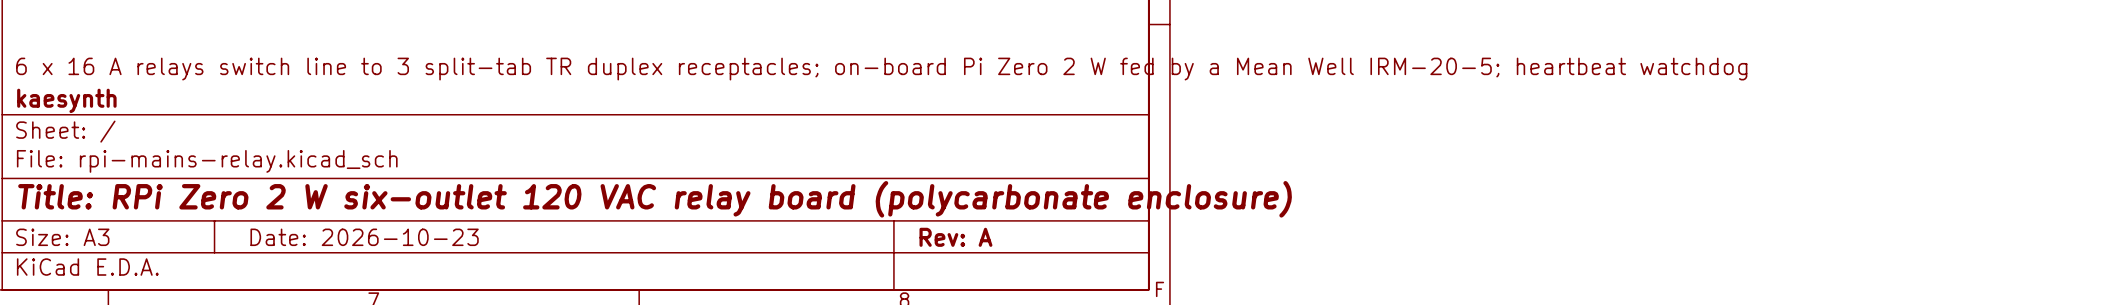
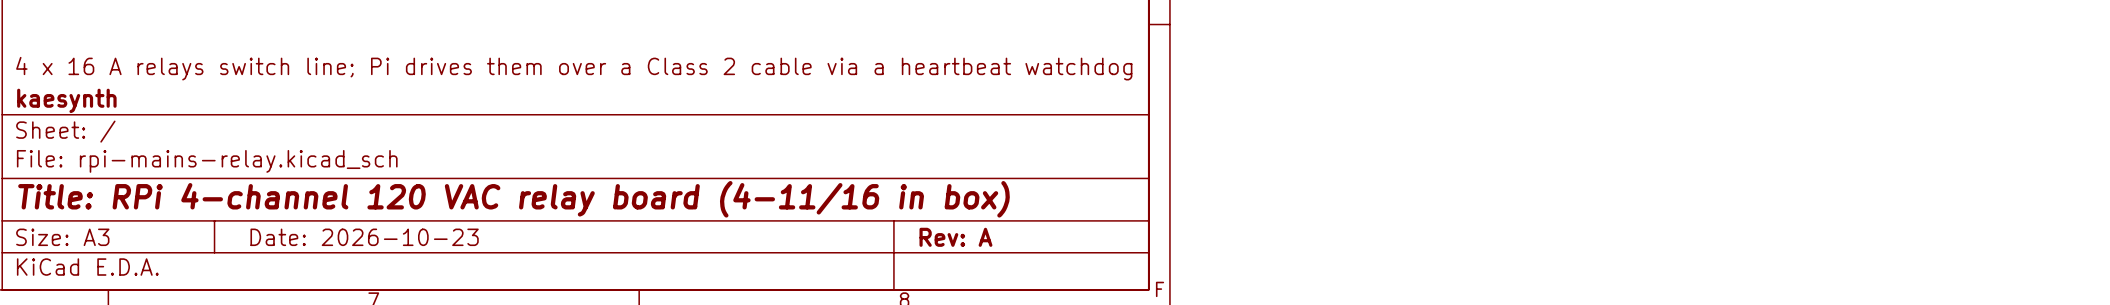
title block: 6 x 16 A relays switch line to 3 split-tab TR duplex receptacles; on-board Pi Zero 2 W fed by a Mean Well IRM-20-5; heartbeat watchdog (881, 69) -> 4 x 16 A relays switch line; Pi drives them over a Class 2 cable via a heartbeat watchdog (574, 68)
title block: Title: RPi Zero 2 W six-outlet 120 VAC relay board (polycarbonate enclosure) (655, 199) -> Title: RPi 4-channel 120 VAC relay board (4-11/16 in box) (514, 199)

